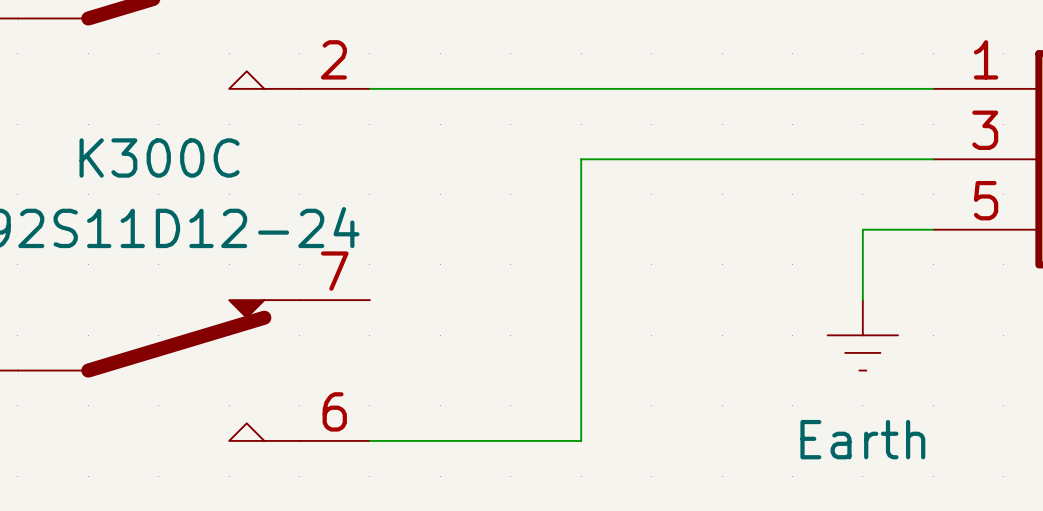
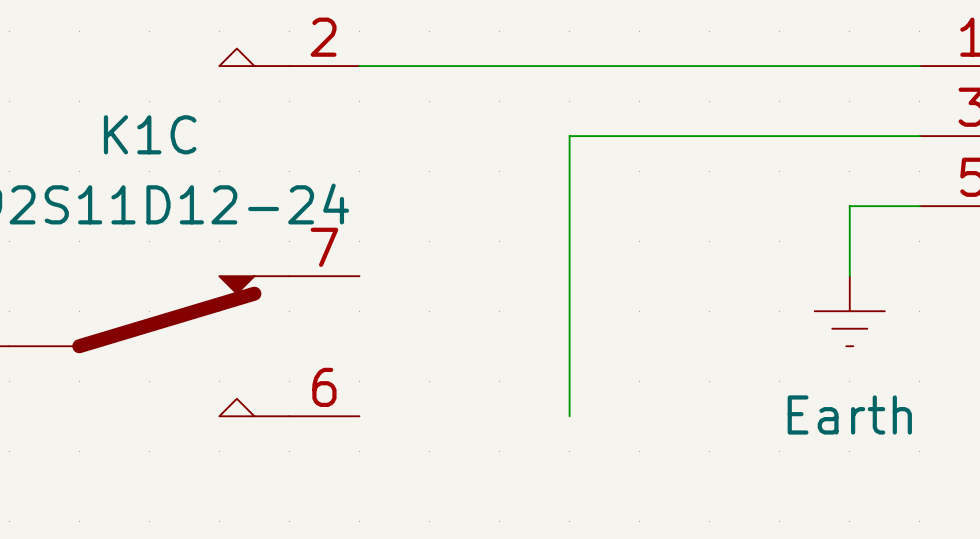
K300C name: K300C (159, 157) -> K1C (150, 134)
wire: (369, 440) (581, 440) -> none

